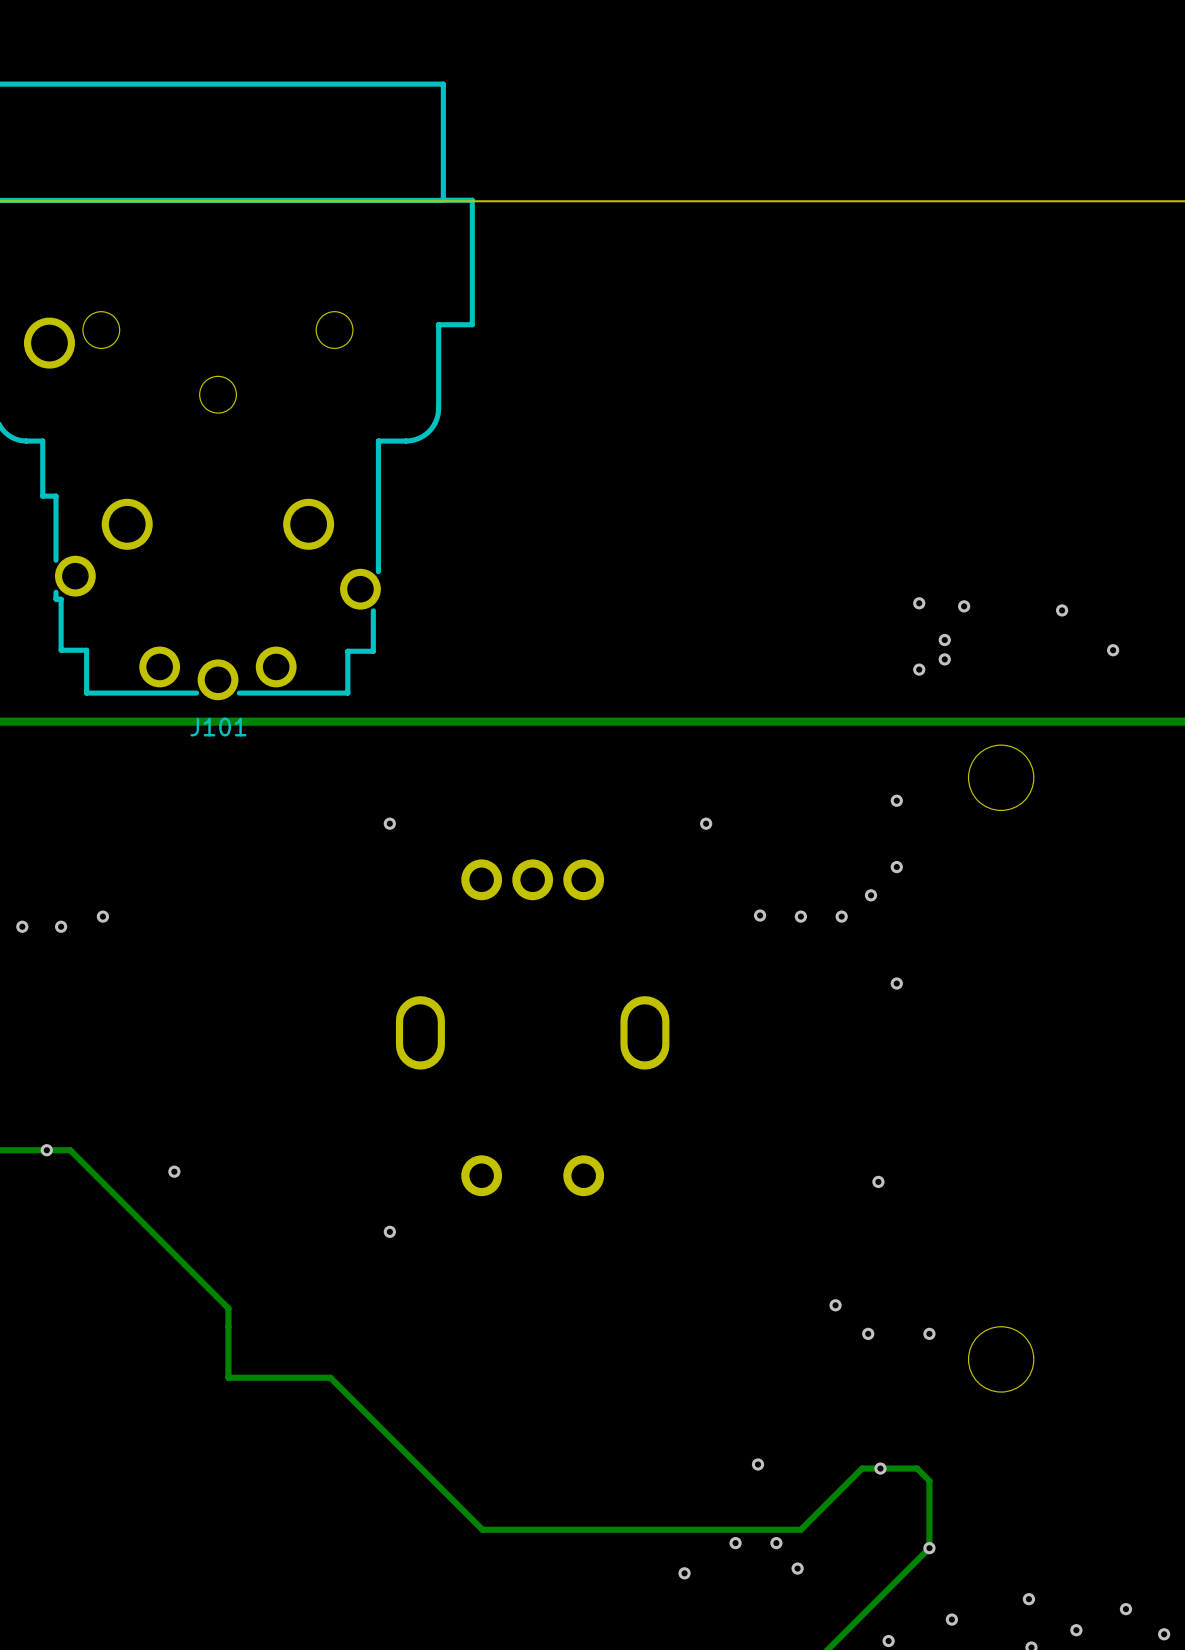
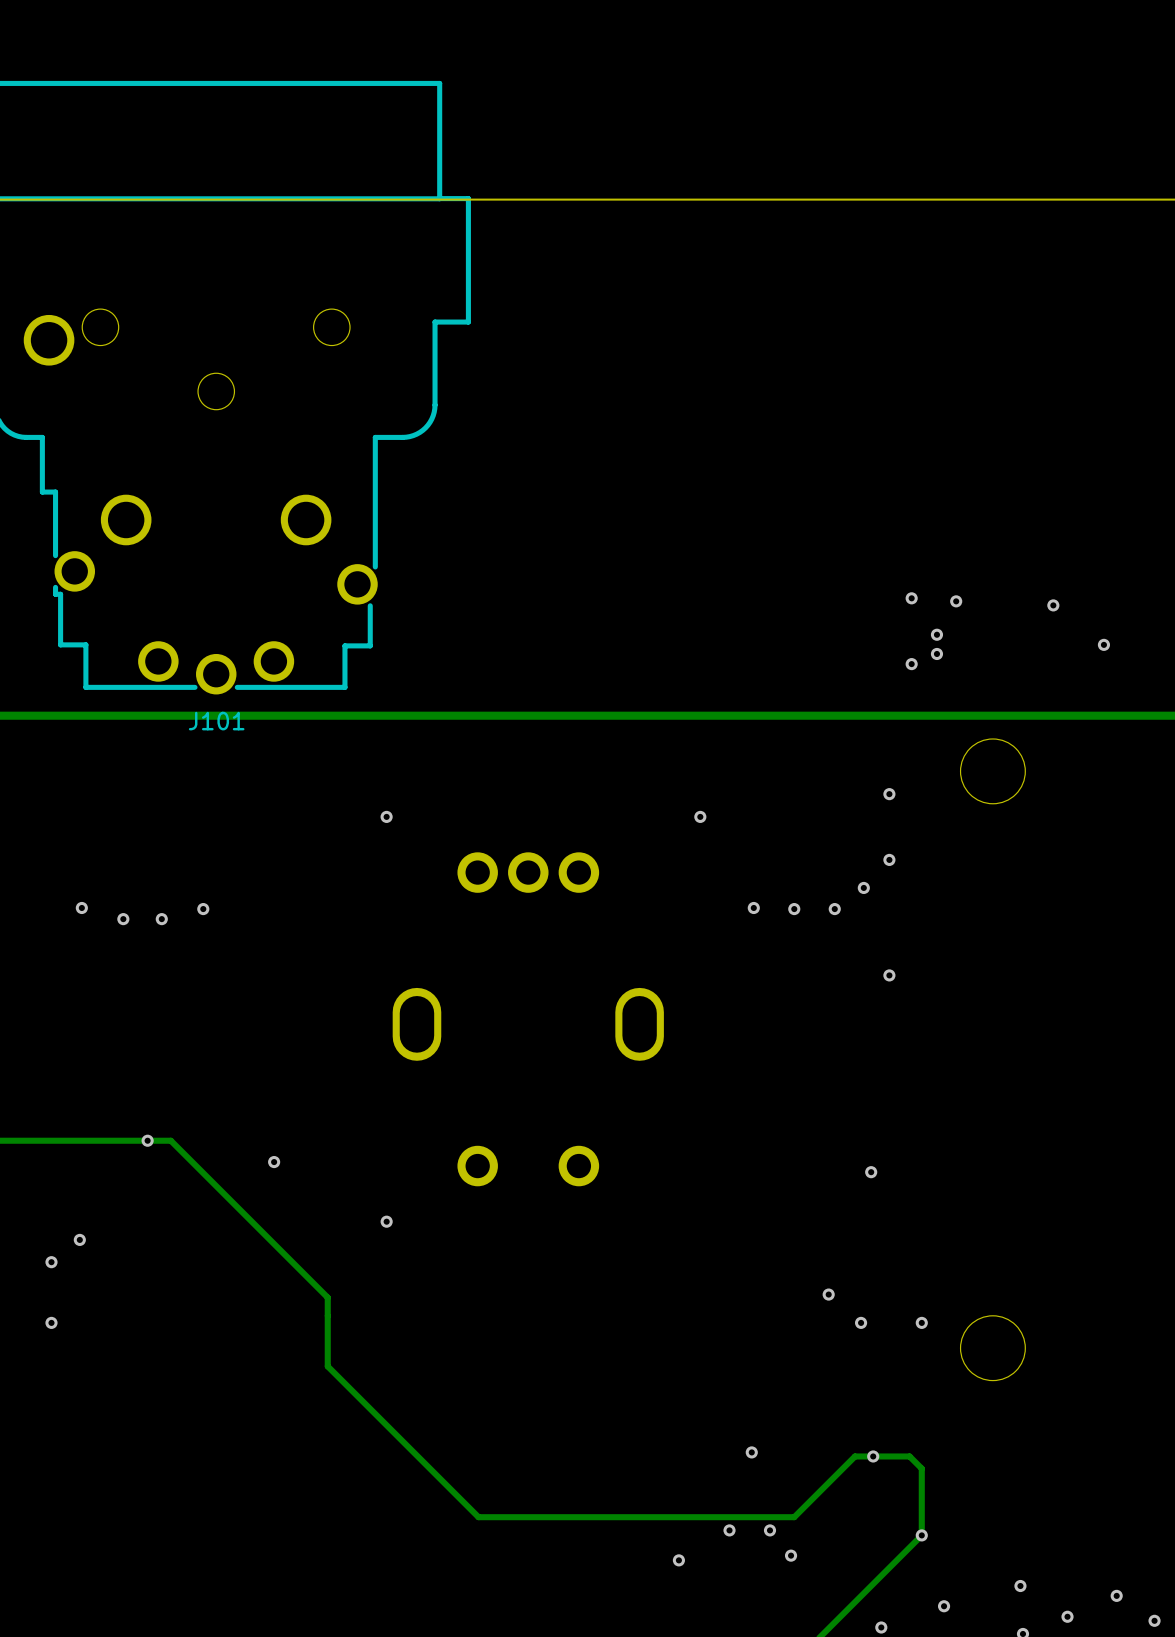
via: none -> (81, 907)
via: (102, 916) -> none
via: none -> (203, 909)
via: (22, 926) -> none
via: (61, 926) -> none
via: none -> (123, 919)
via: none -> (161, 919)
via: (46, 1150) -> none
track: (70, 1150) (228, 1308) (228, 1377) (330, 1377) -> (69, 1140) (170, 1140) (327, 1297) (327, 1366)
via position: (174, 1171) -> (147, 1140)
via: none -> (274, 1162)
via: none -> (79, 1239)
via: none -> (51, 1262)
via: none -> (51, 1322)

